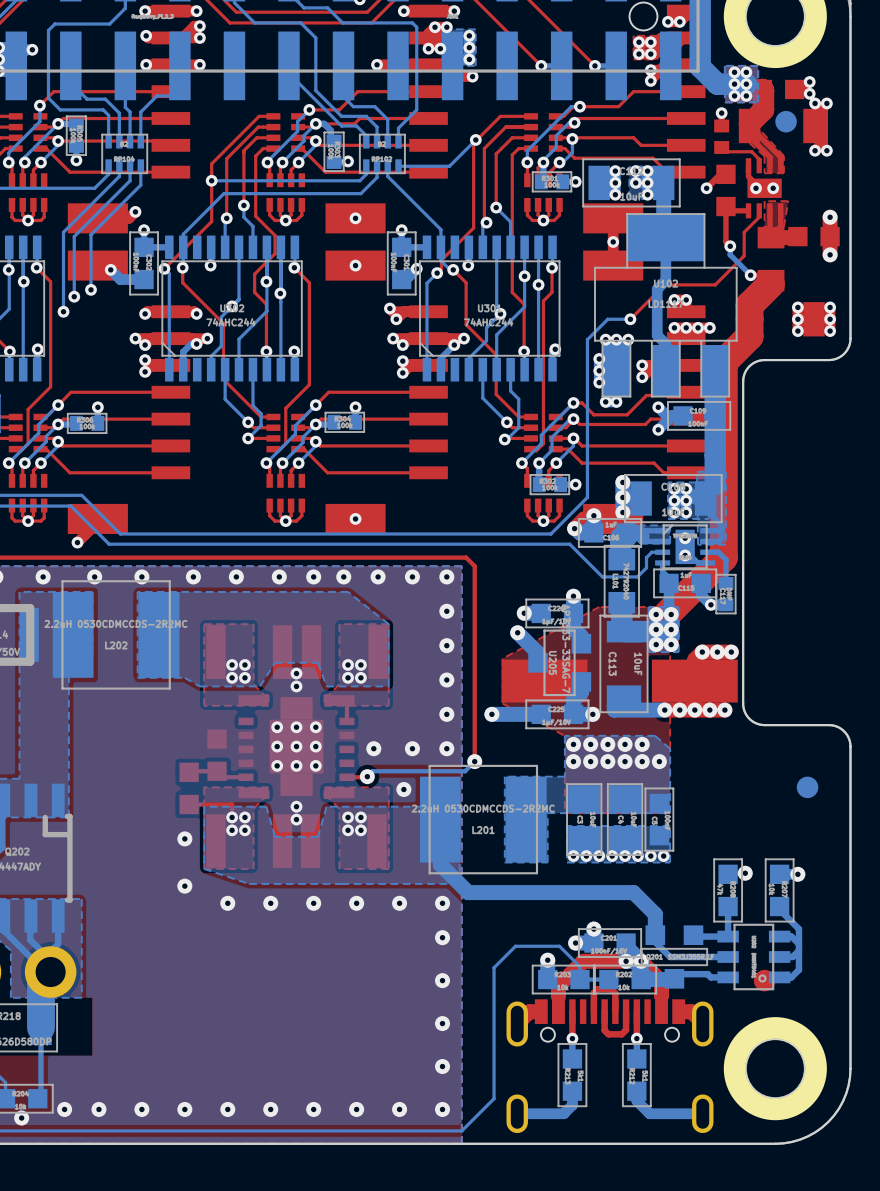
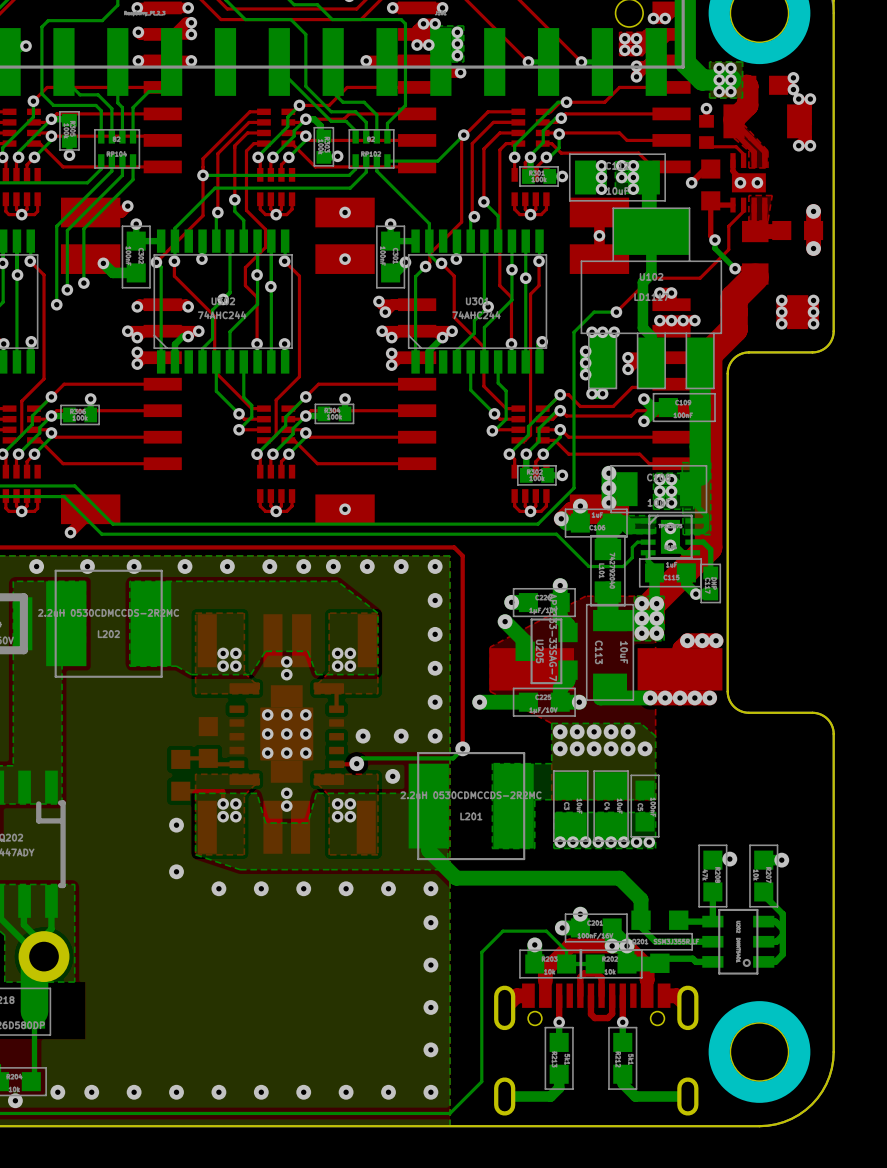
part: (786, 121) -> none
part: (807, 787) -> none
part: (764, 980) -> none

